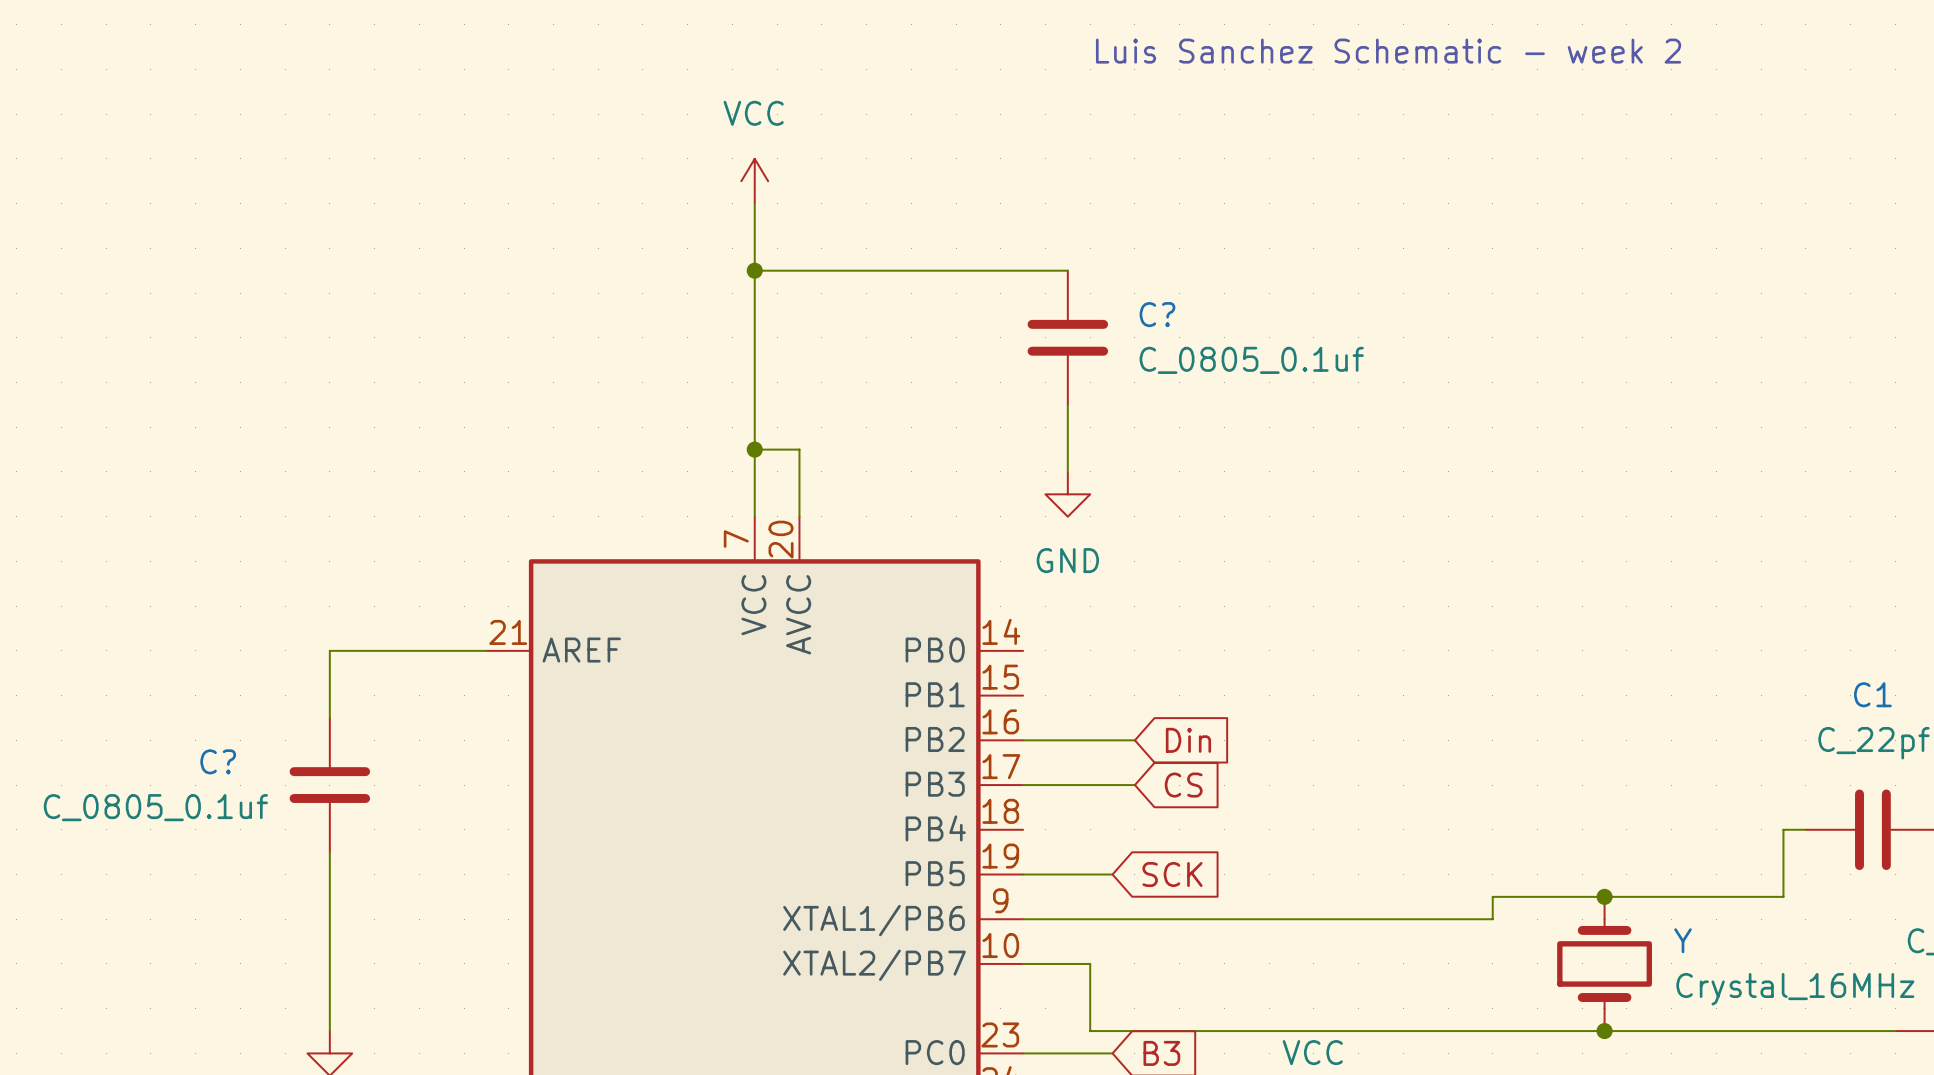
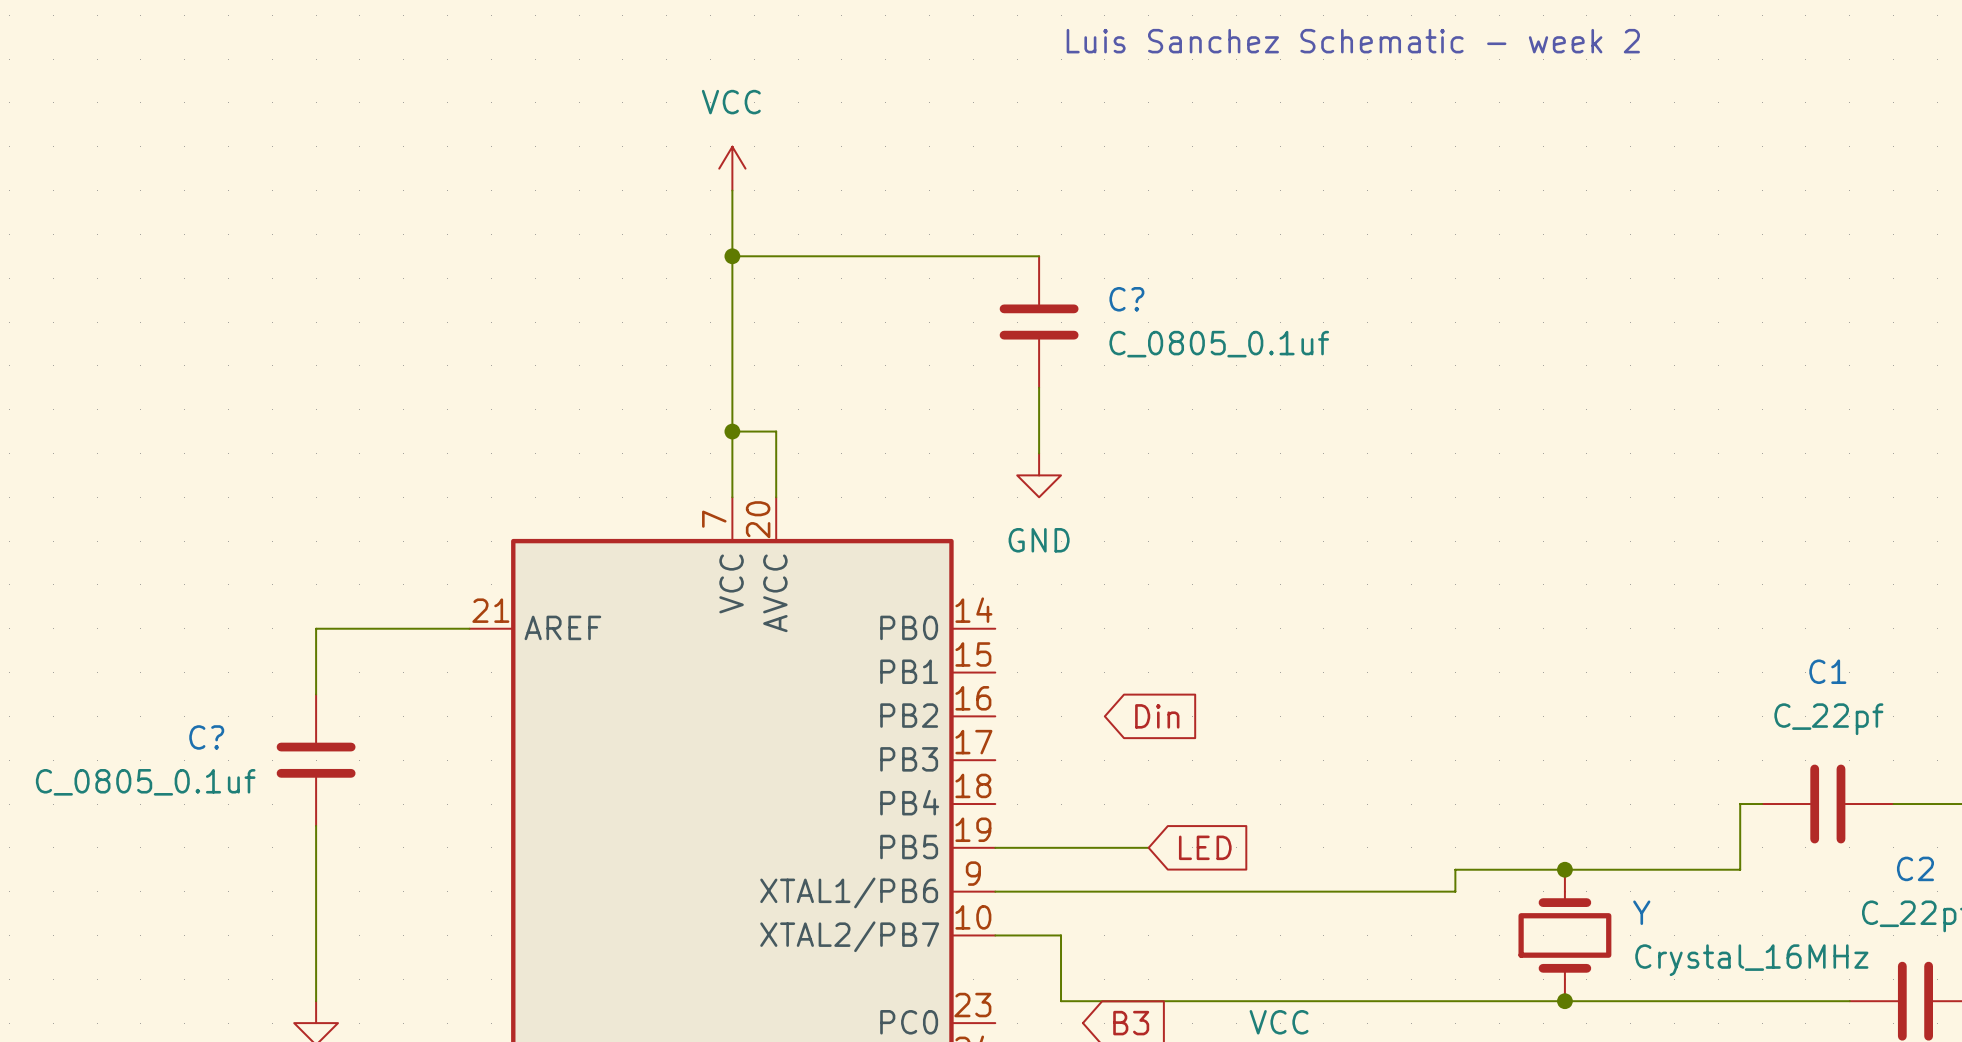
wire: (1023, 740) (1134, 740) -> none
wire: (1023, 785) (1134, 785) -> none
global label: CS (1183, 785) -> none
wire: none -> (1082, 847) (1148, 847)
global label: SCK (1172, 874) -> none
global label: none -> LED (1205, 847)
wire: (1023, 1053) (1112, 1053) -> none

